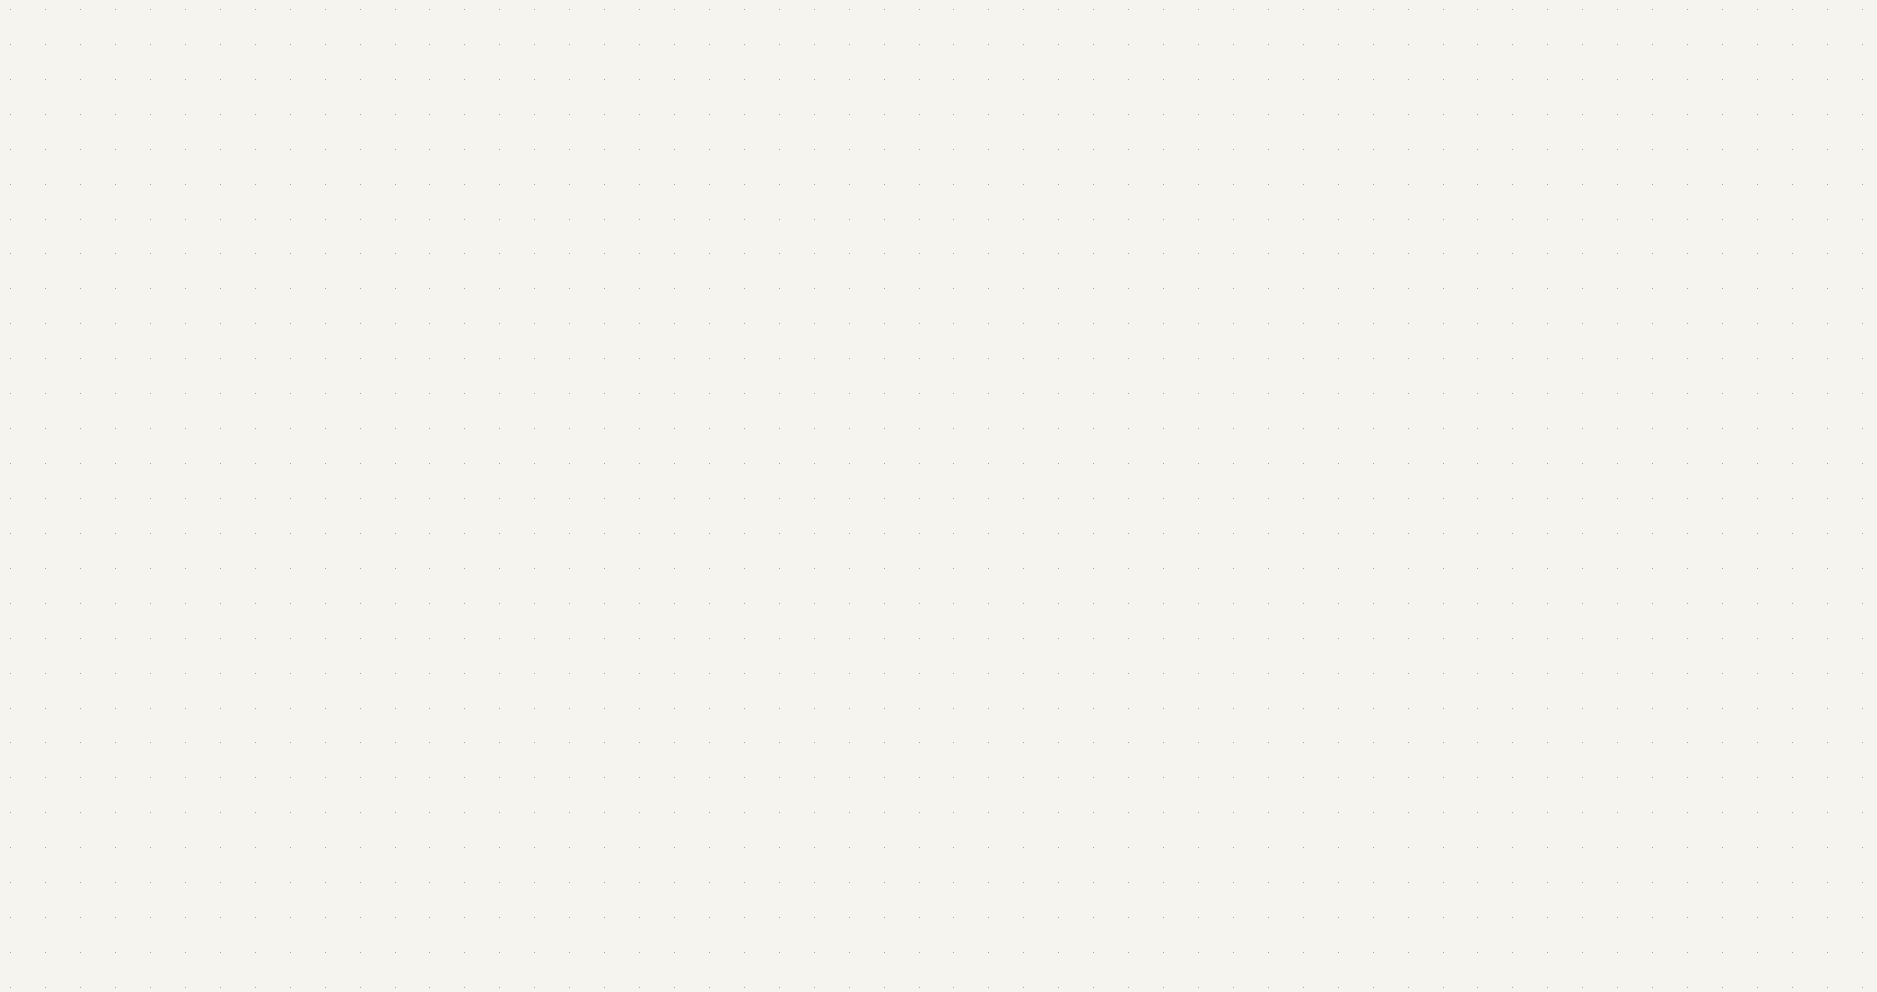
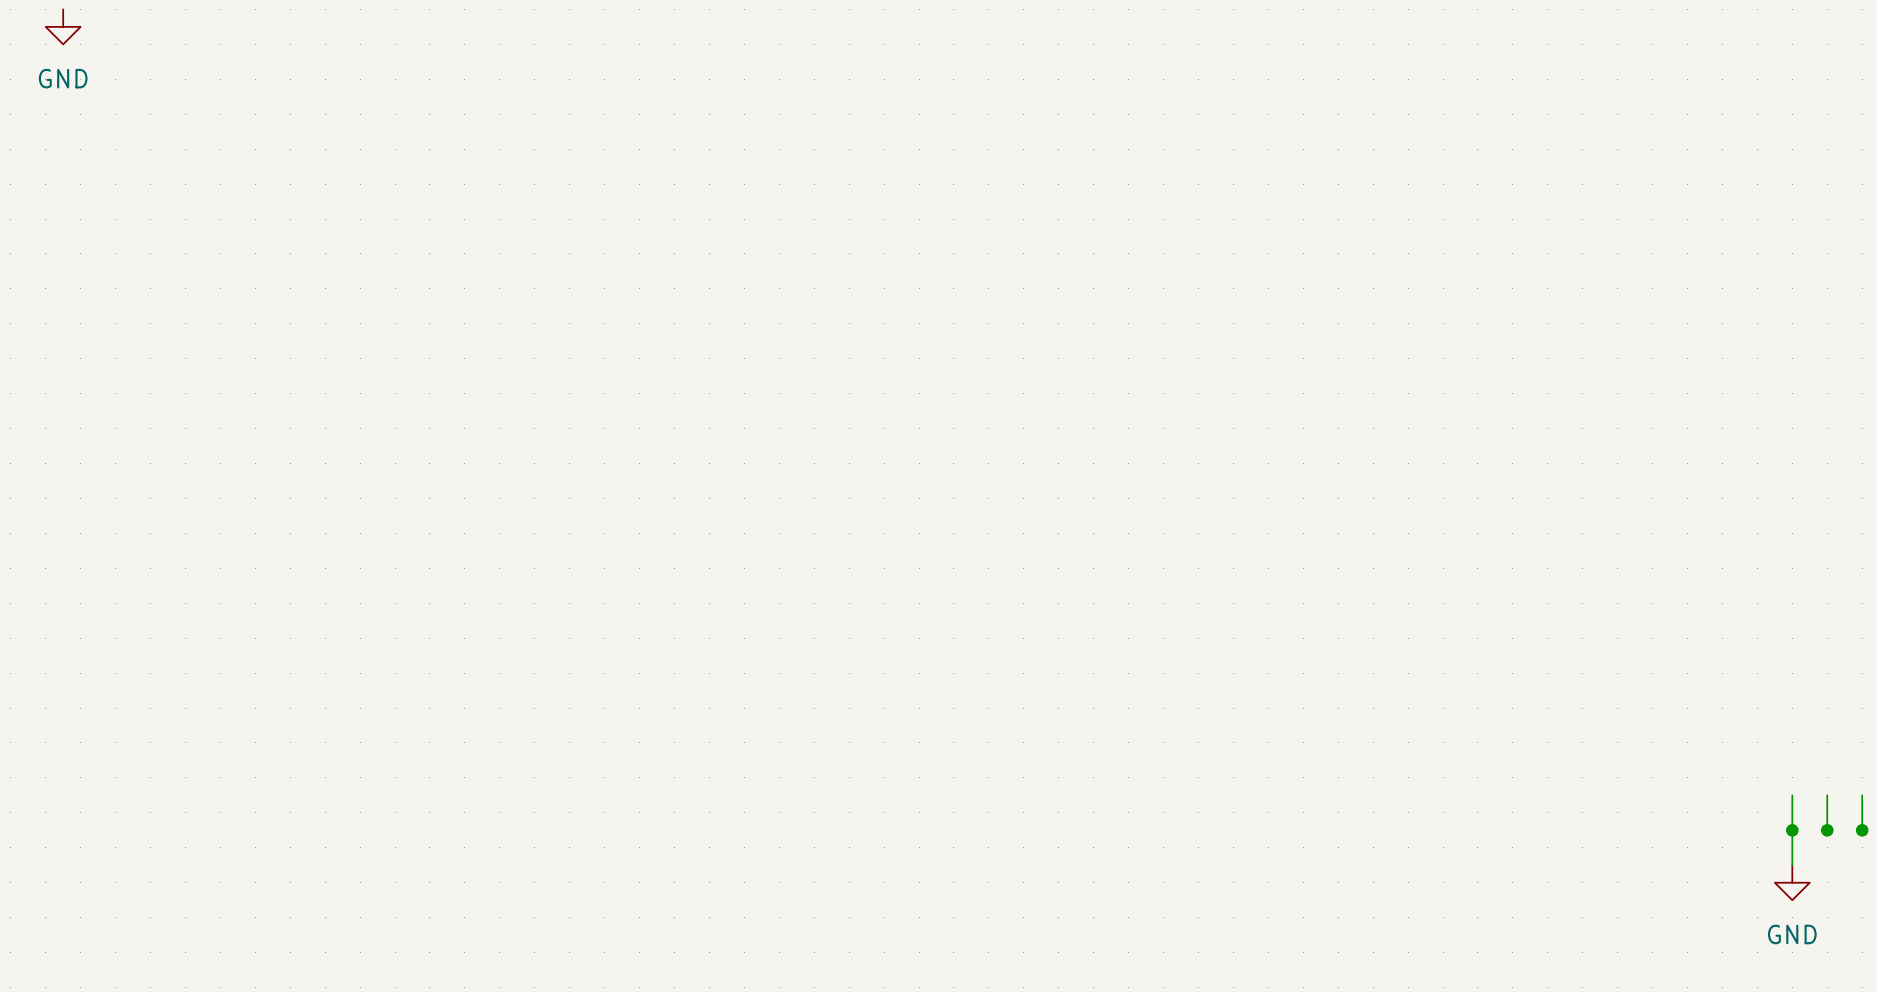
power symbol: none -> GND (63, 26)
wire: none -> (1792, 795) (1792, 865)
wire: none -> (1827, 795) (1827, 830)
wire: none -> (1862, 795) (1862, 830)
junction: none -> (1792, 830)
junction: none -> (1827, 830)
junction: none -> (1862, 830)
power symbol: none -> GND (1792, 882)

